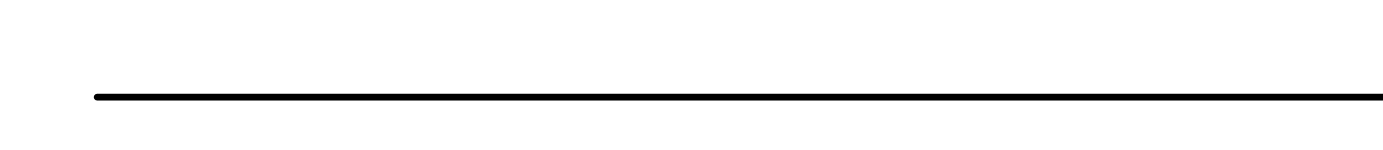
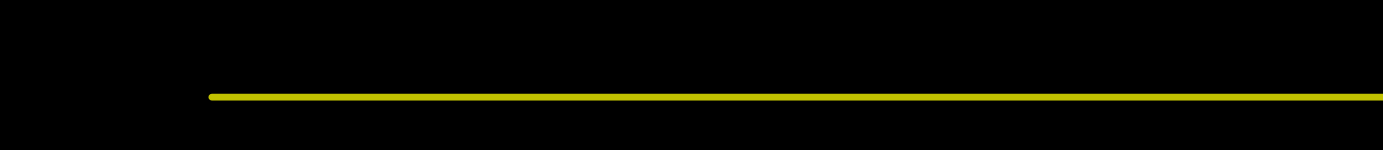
board edge: (97, 97) (211, 97) -> none

